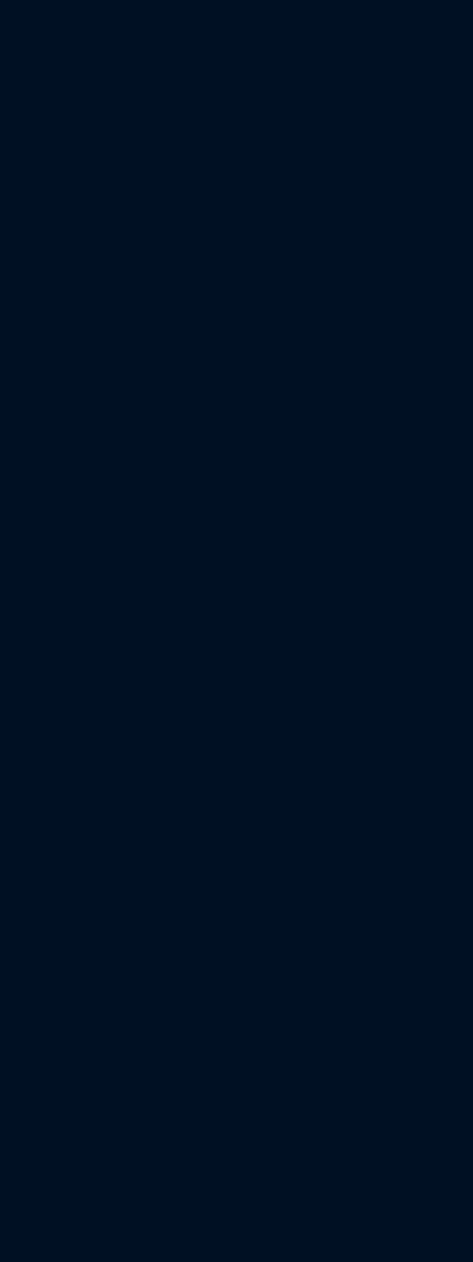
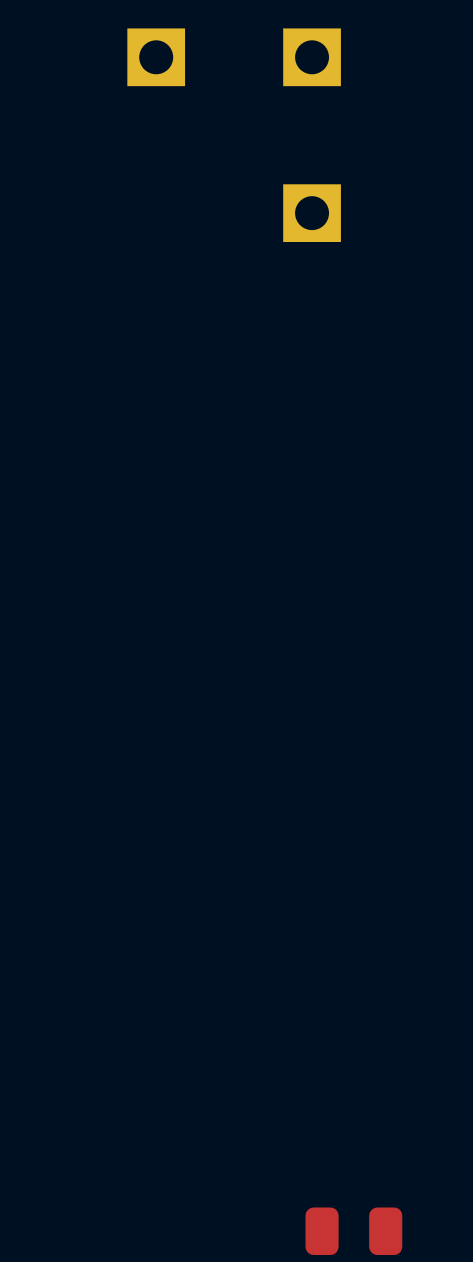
part: none -> (156, 57)
part: none -> (312, 57)
part: none -> (312, 213)
part: none -> (353, 1231)

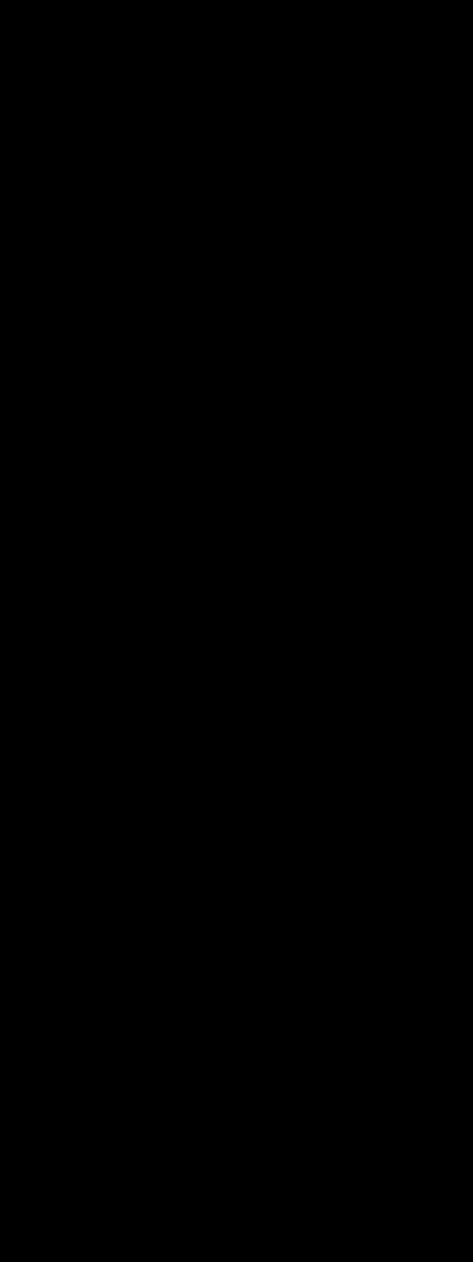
part: (156, 57) -> none
part: (312, 57) -> none
part: (312, 213) -> none
part: (353, 1231) -> none

